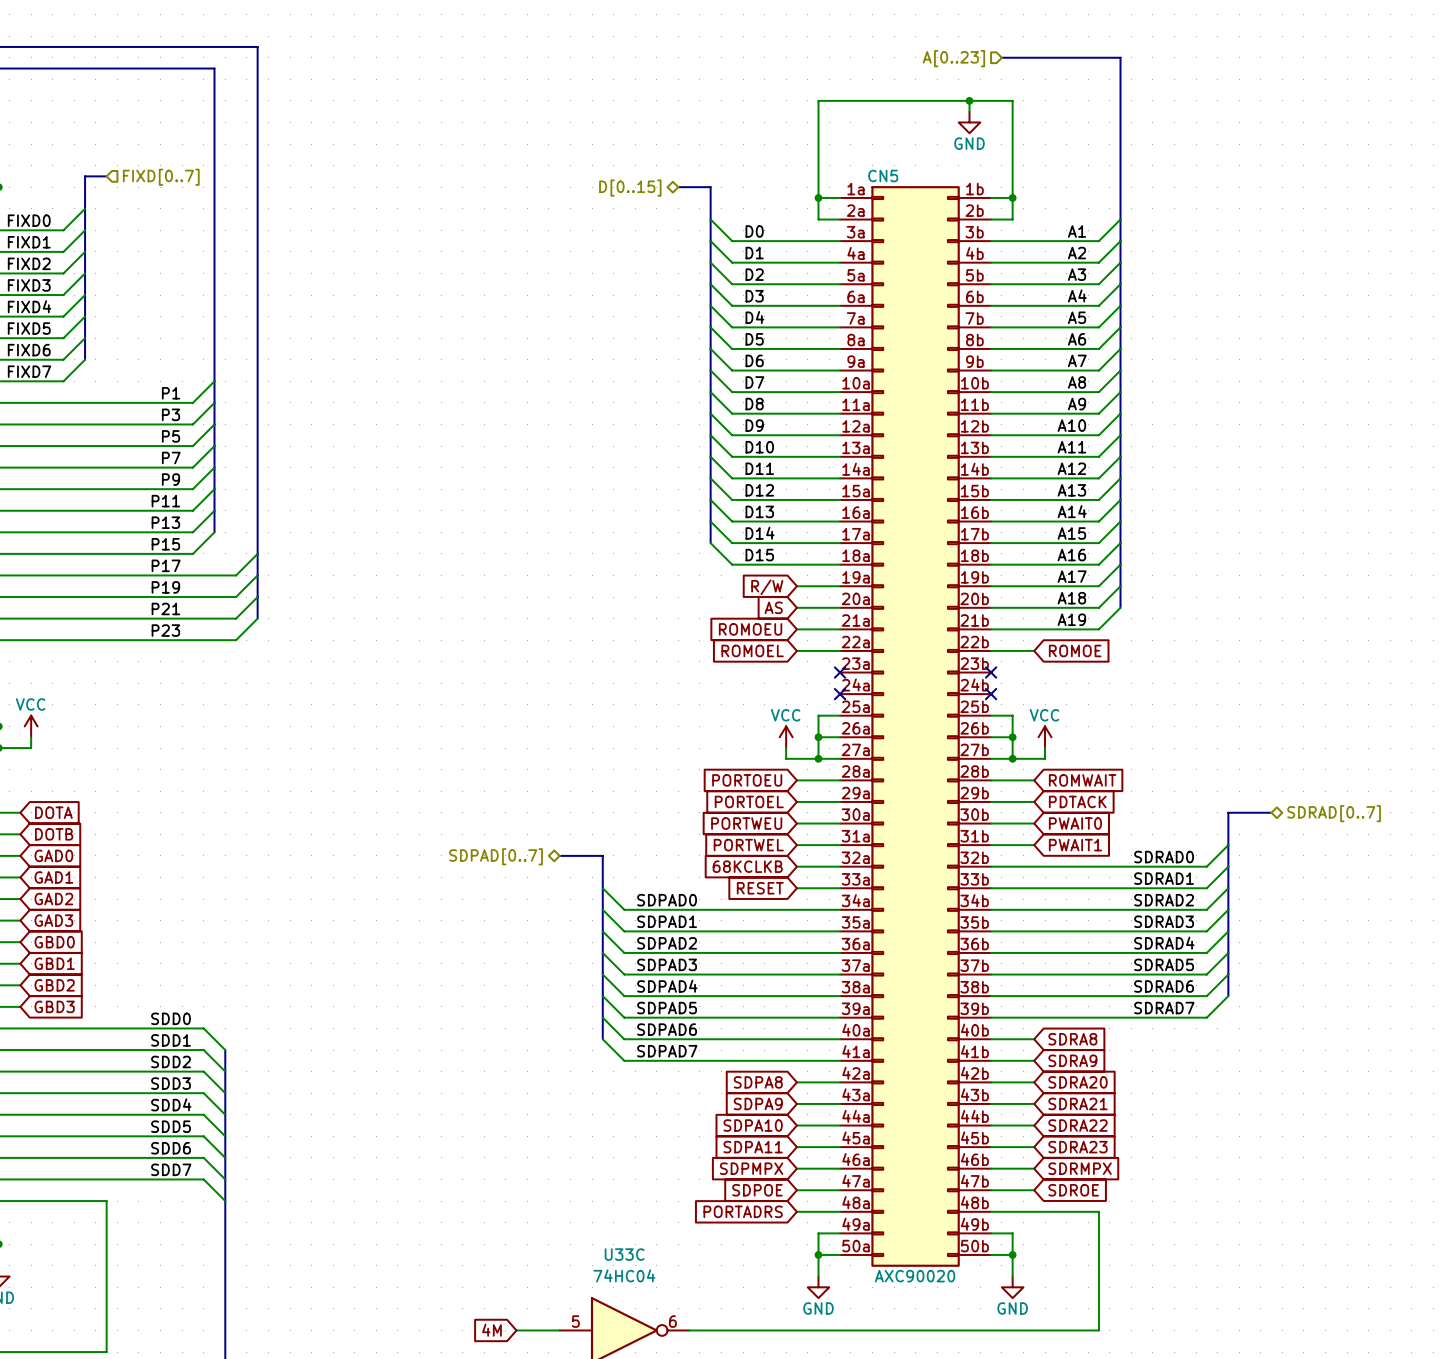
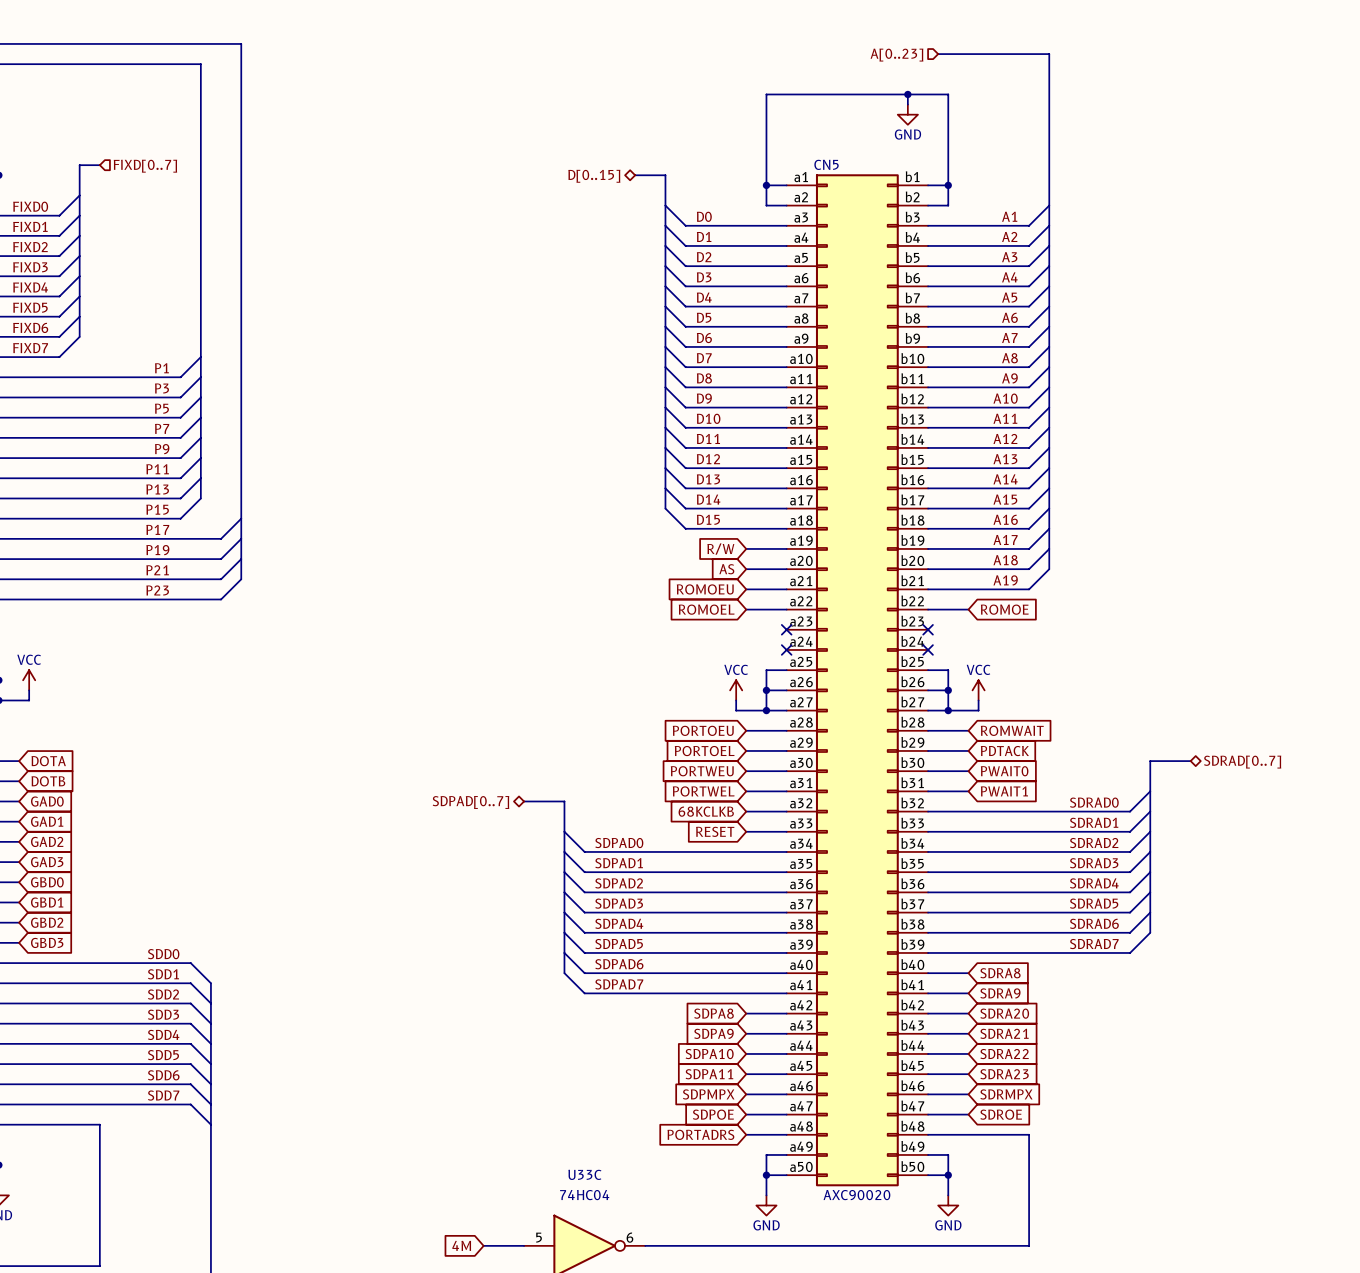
CN5 symbol: [840, 186, 992, 1267] -> [786, 174, 929, 1187]

